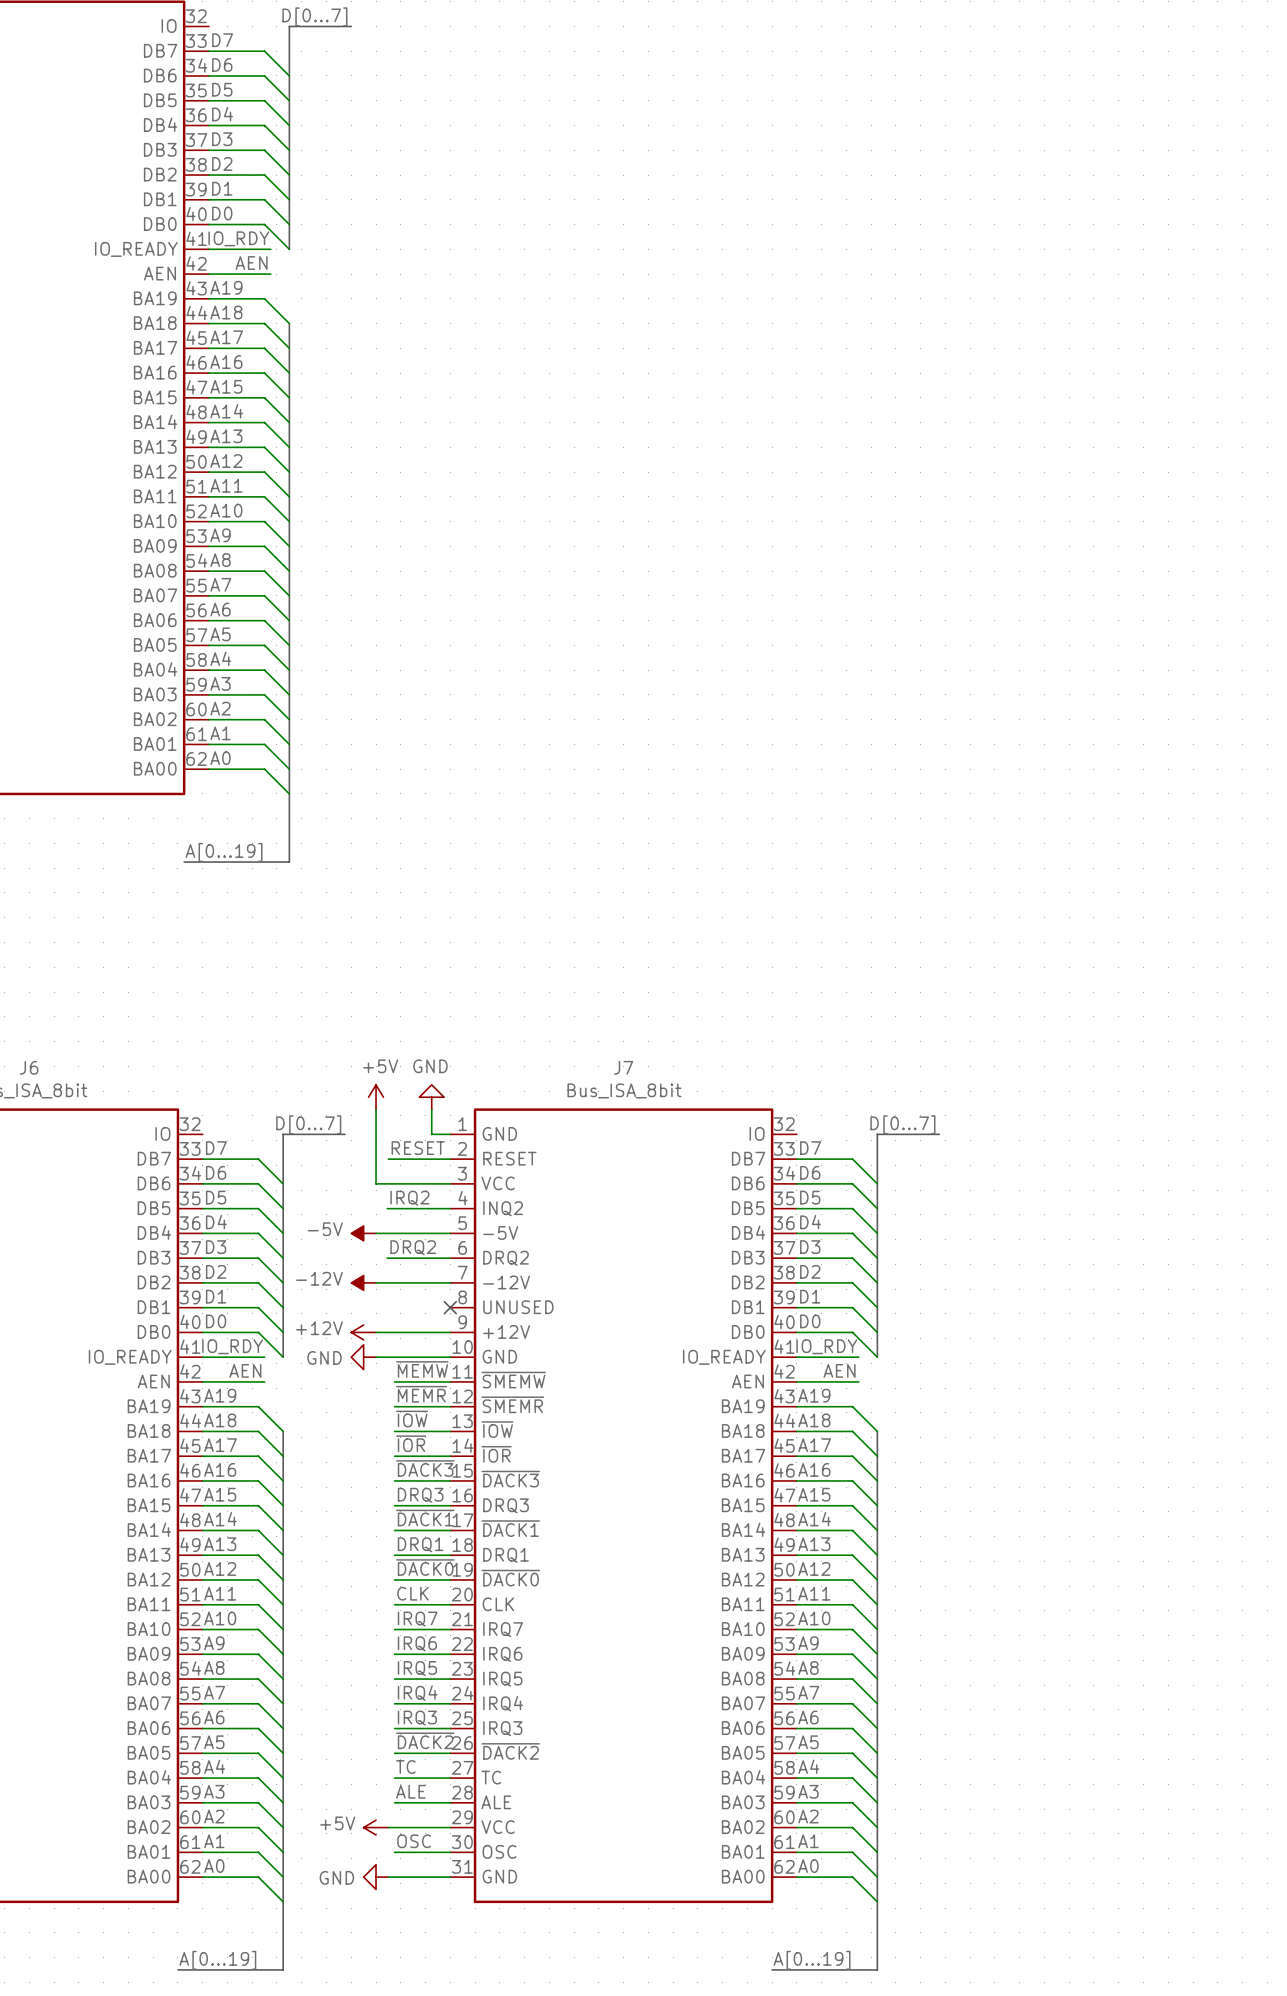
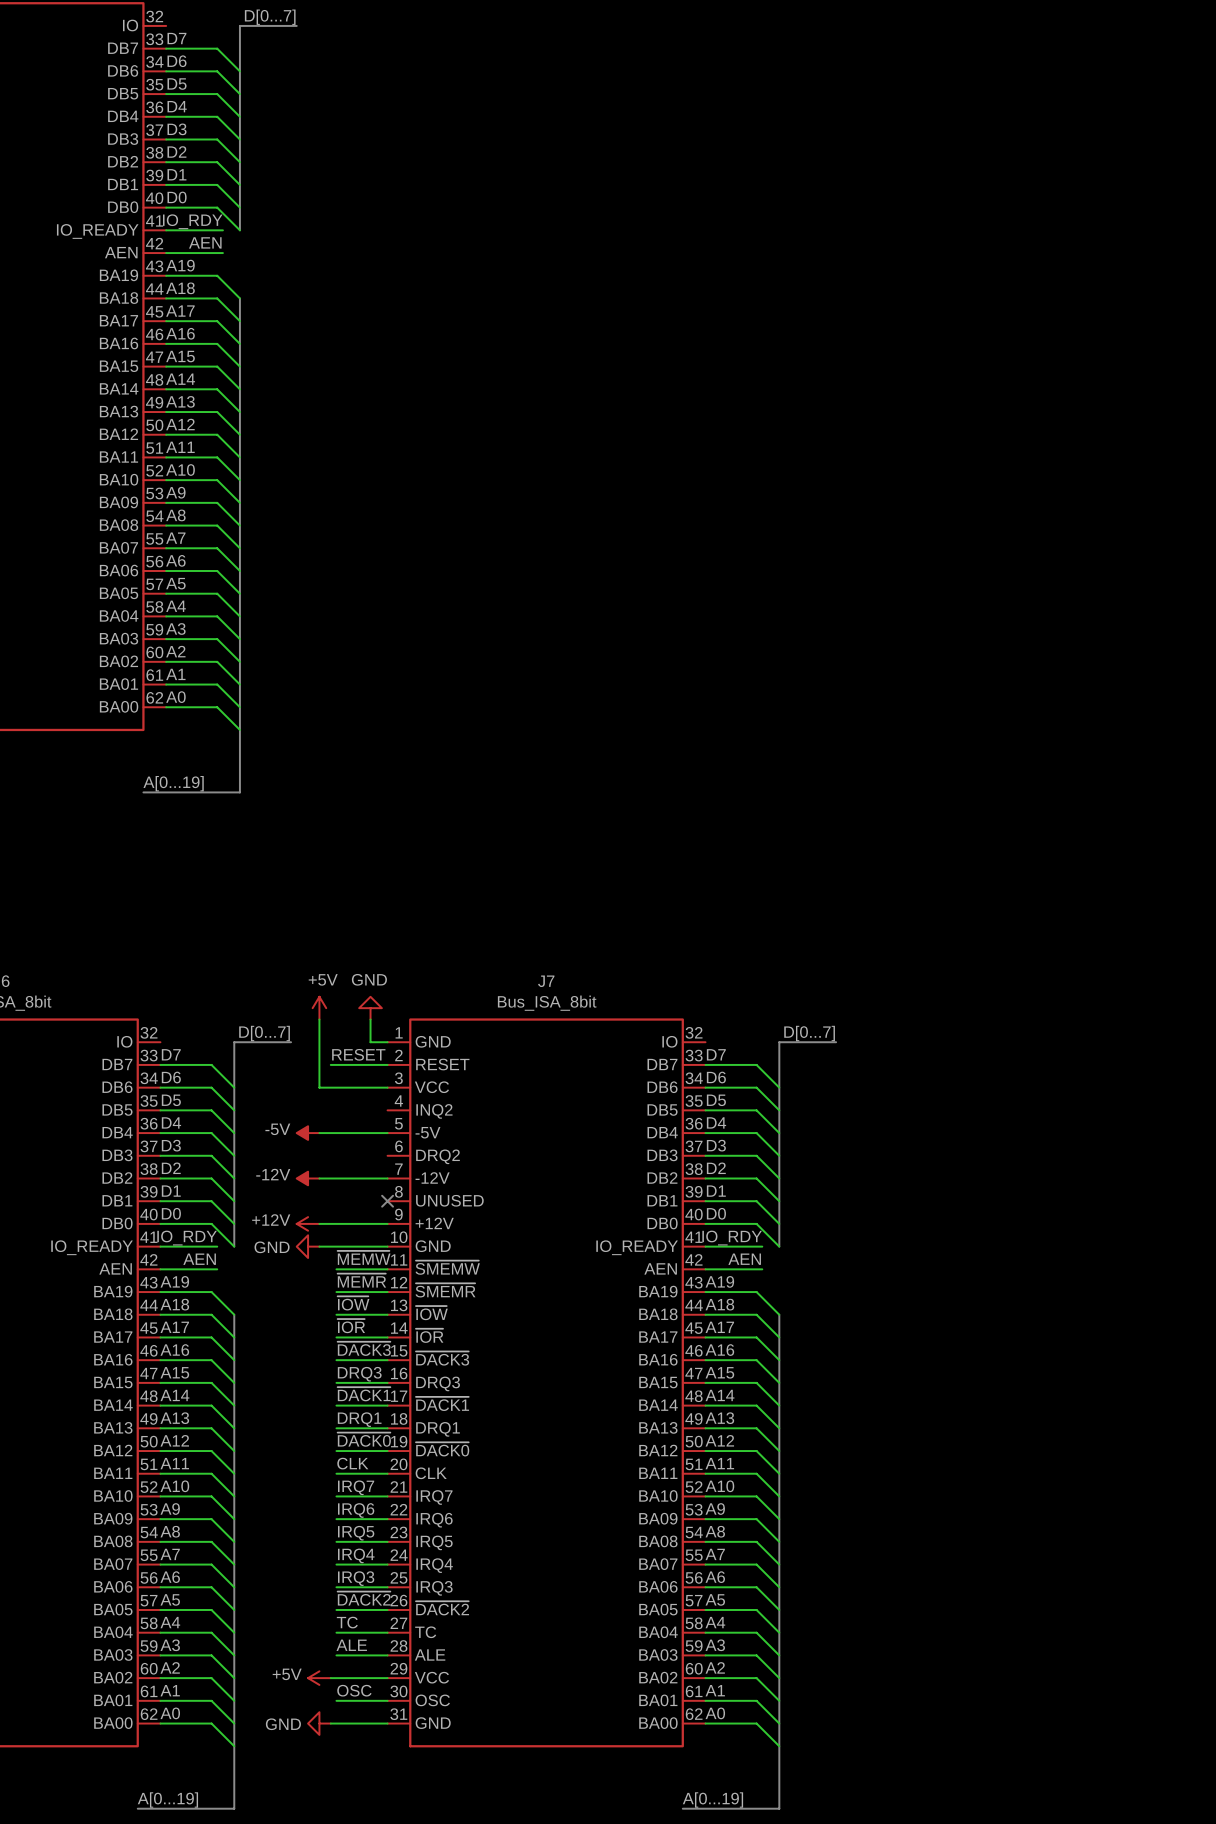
label: IRQ2 (409, 1198) -> none
wire: (387, 1208) (450, 1208) -> none
label: DRQ2 (413, 1247) -> none
wire: (387, 1258) (450, 1258) -> none

